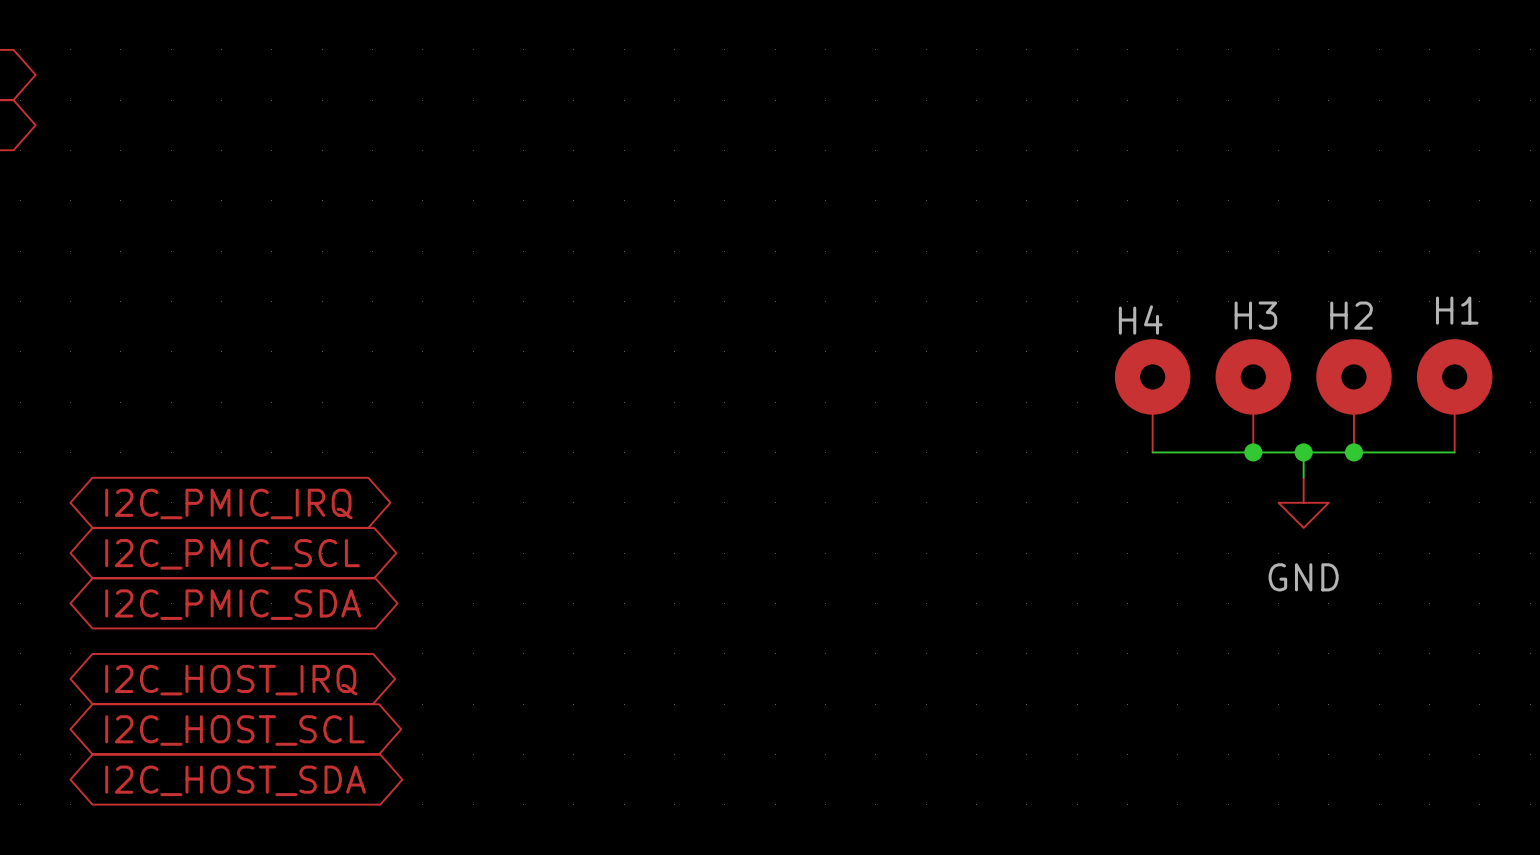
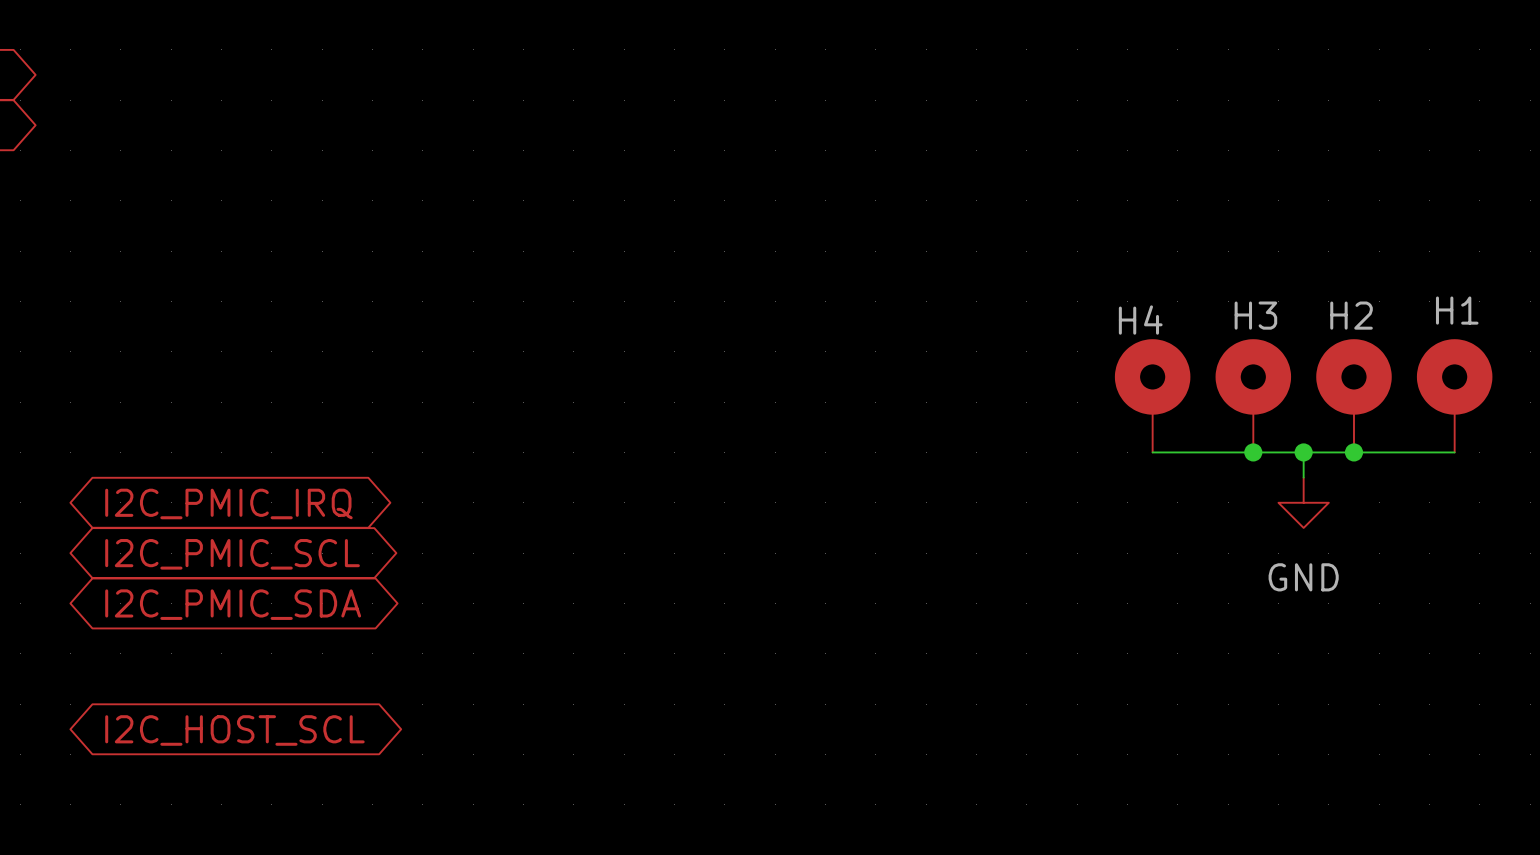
global label: I2C_HOST_IRQ (231, 680) -> none
global label: I2C_HOST_SDA (235, 780) -> none

